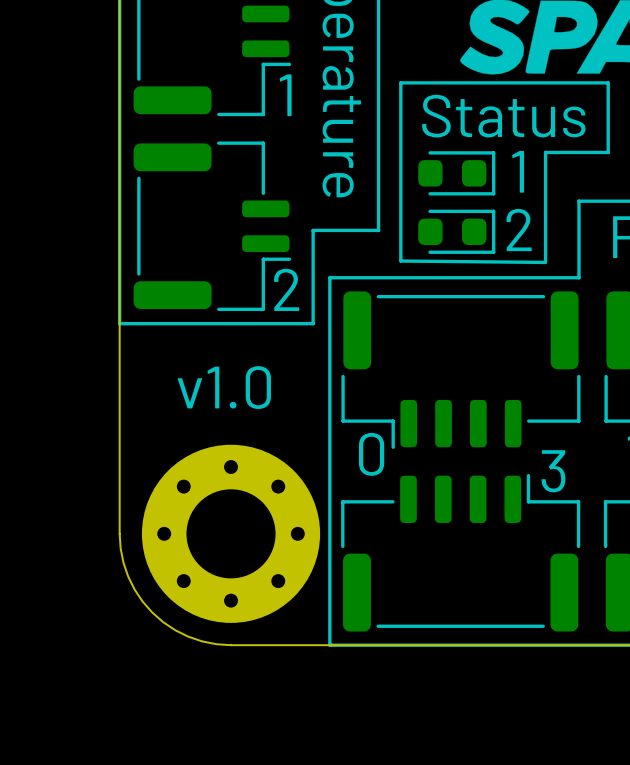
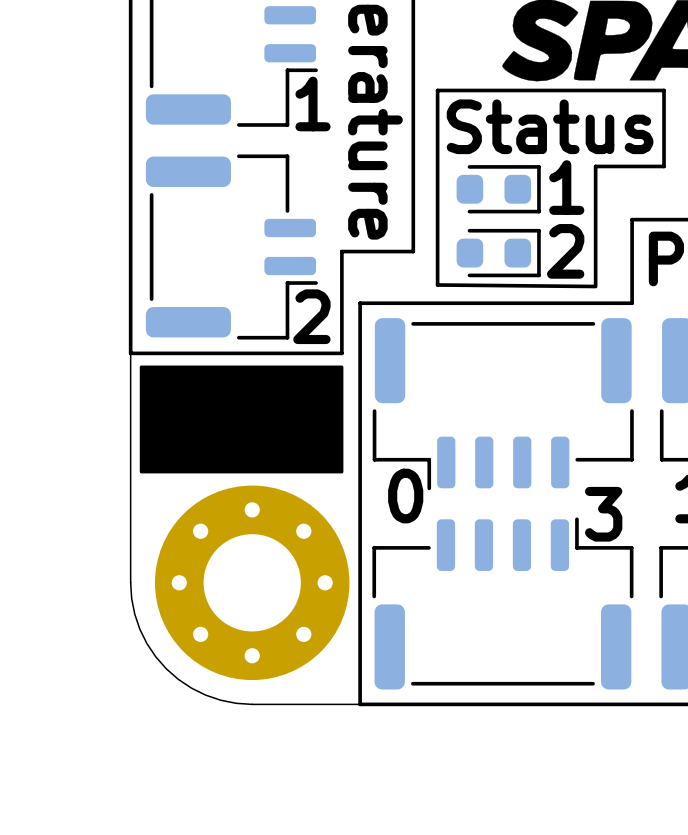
drawing: none -> [139, 365, 344, 474]
text: v1.0 (224, 387) -> none

